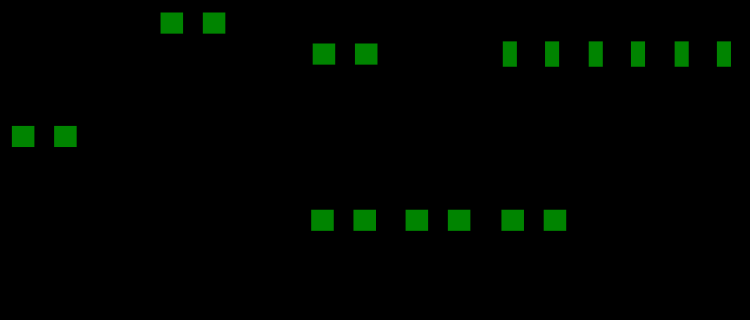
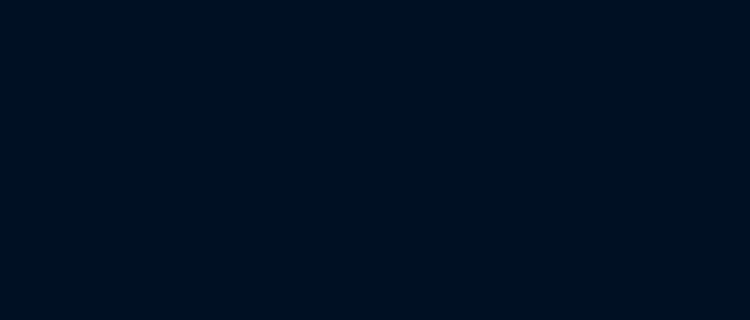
part: (192, 23) -> none
part: (345, 54) -> none
part: (530, 54) -> none
part: (616, 54) -> none
part: (702, 54) -> none
part: (44, 136) -> none
part: (343, 220) -> none
part: (437, 220) -> none
part: (533, 220) -> none

